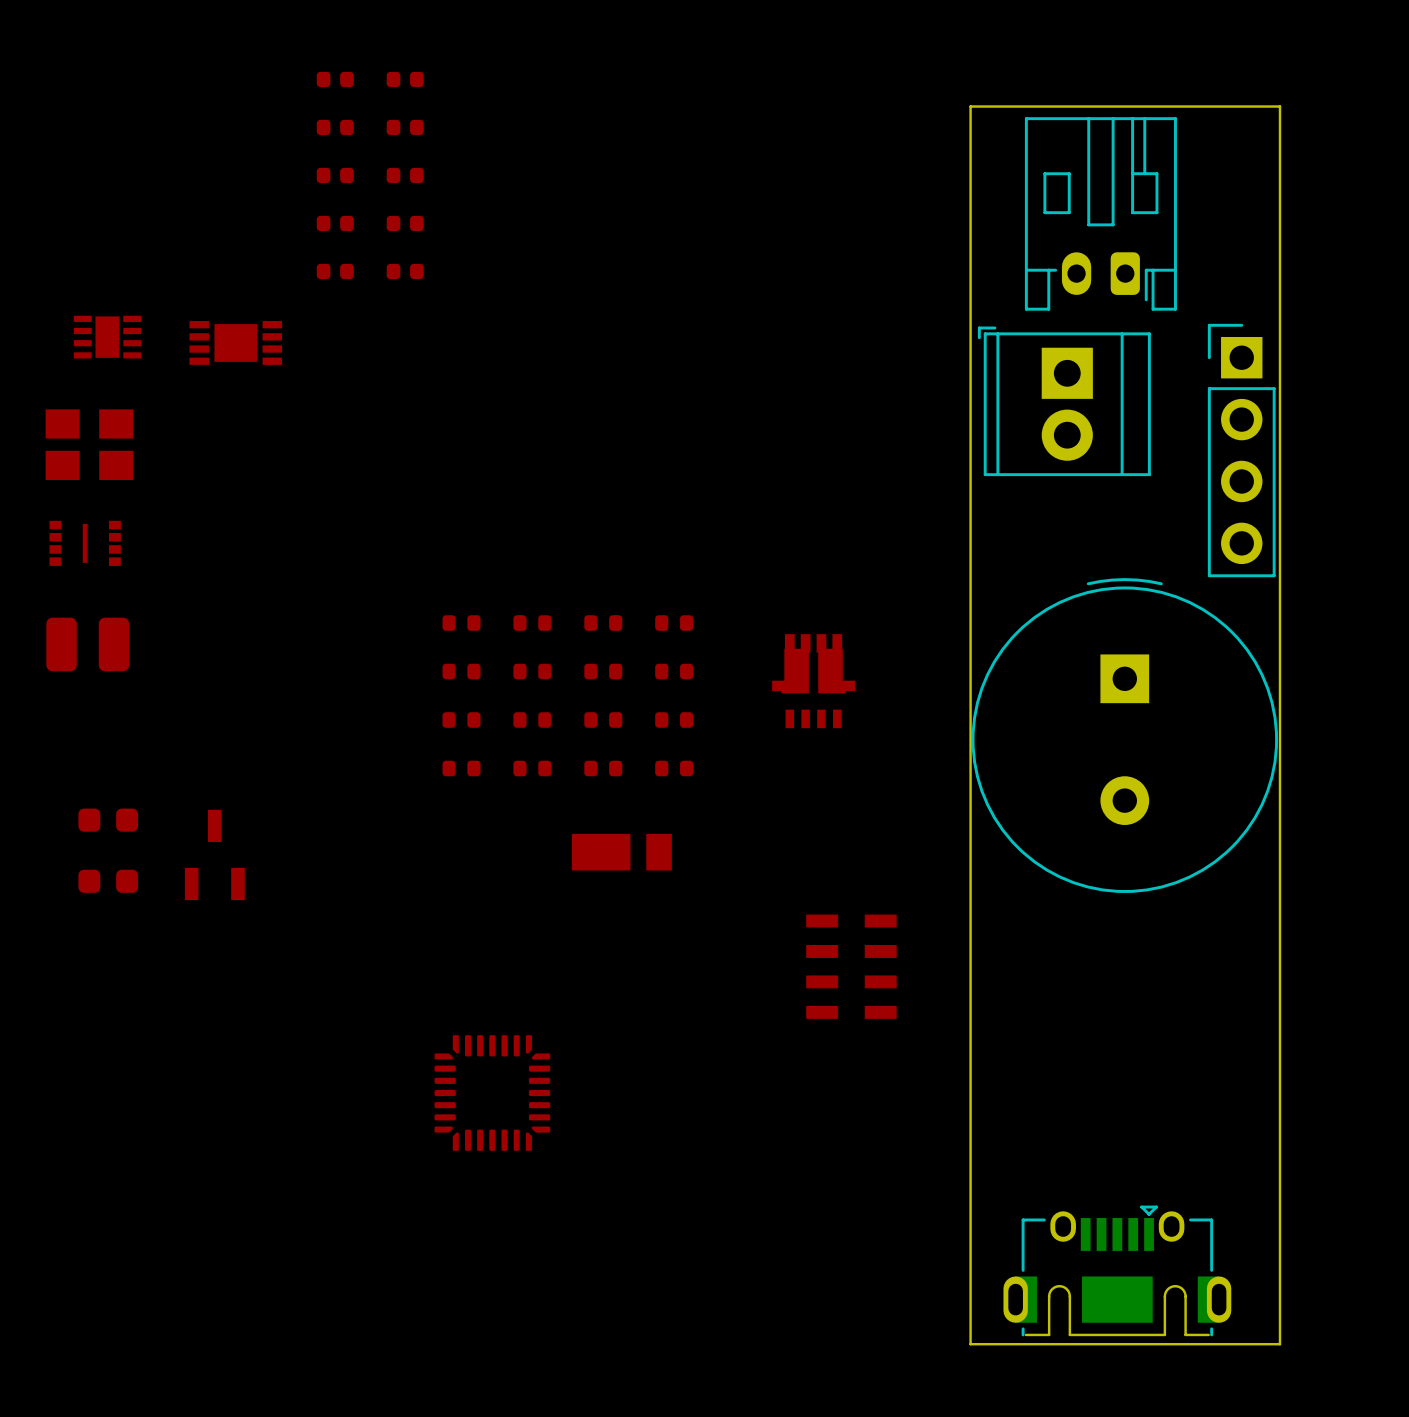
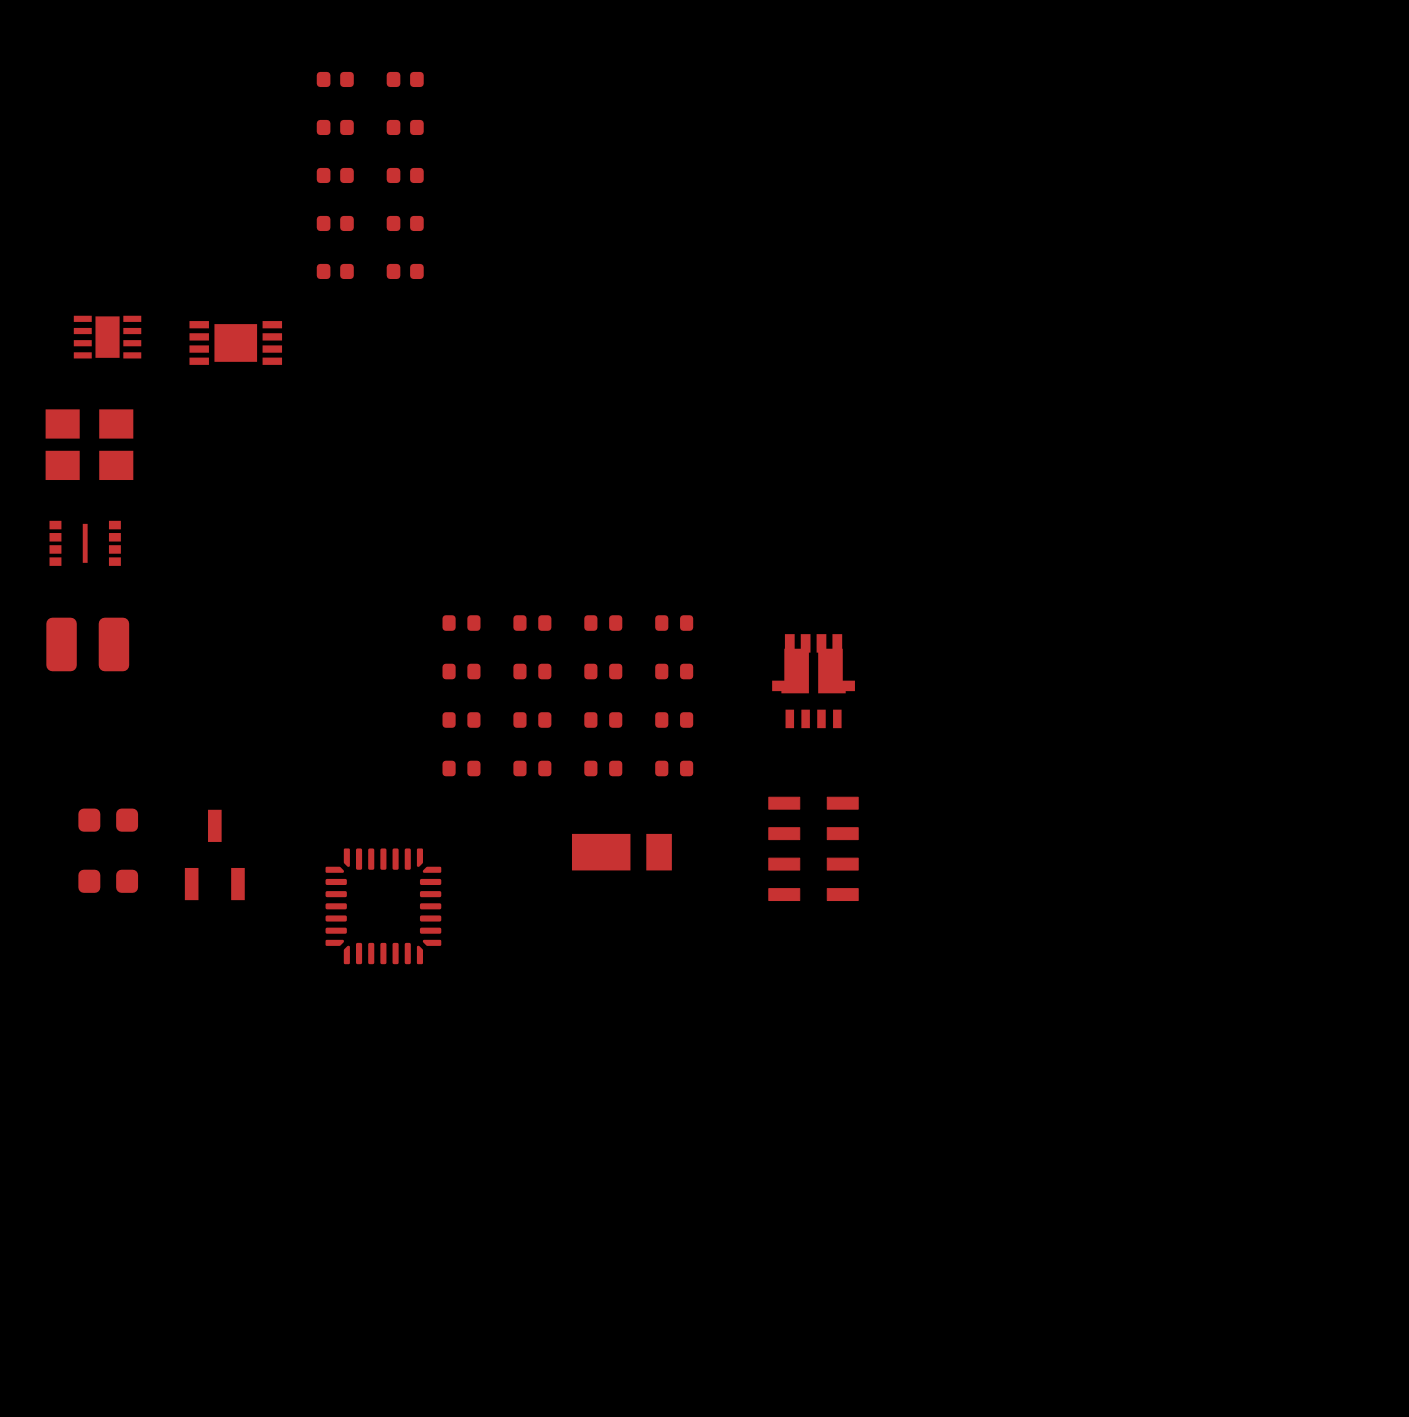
board edge: (1279, 106) (970, 106) (970, 1344) (1279, 1344) (1279, 106) -> none
part: (1100, 213) -> none
part: (1064, 401) -> none
part: (1241, 450) -> none
part: (1124, 735) -> none
part position: (851, 966) -> (813, 848)
part position: (492, 1093) -> (383, 906)
part: (1117, 1270) -> none

